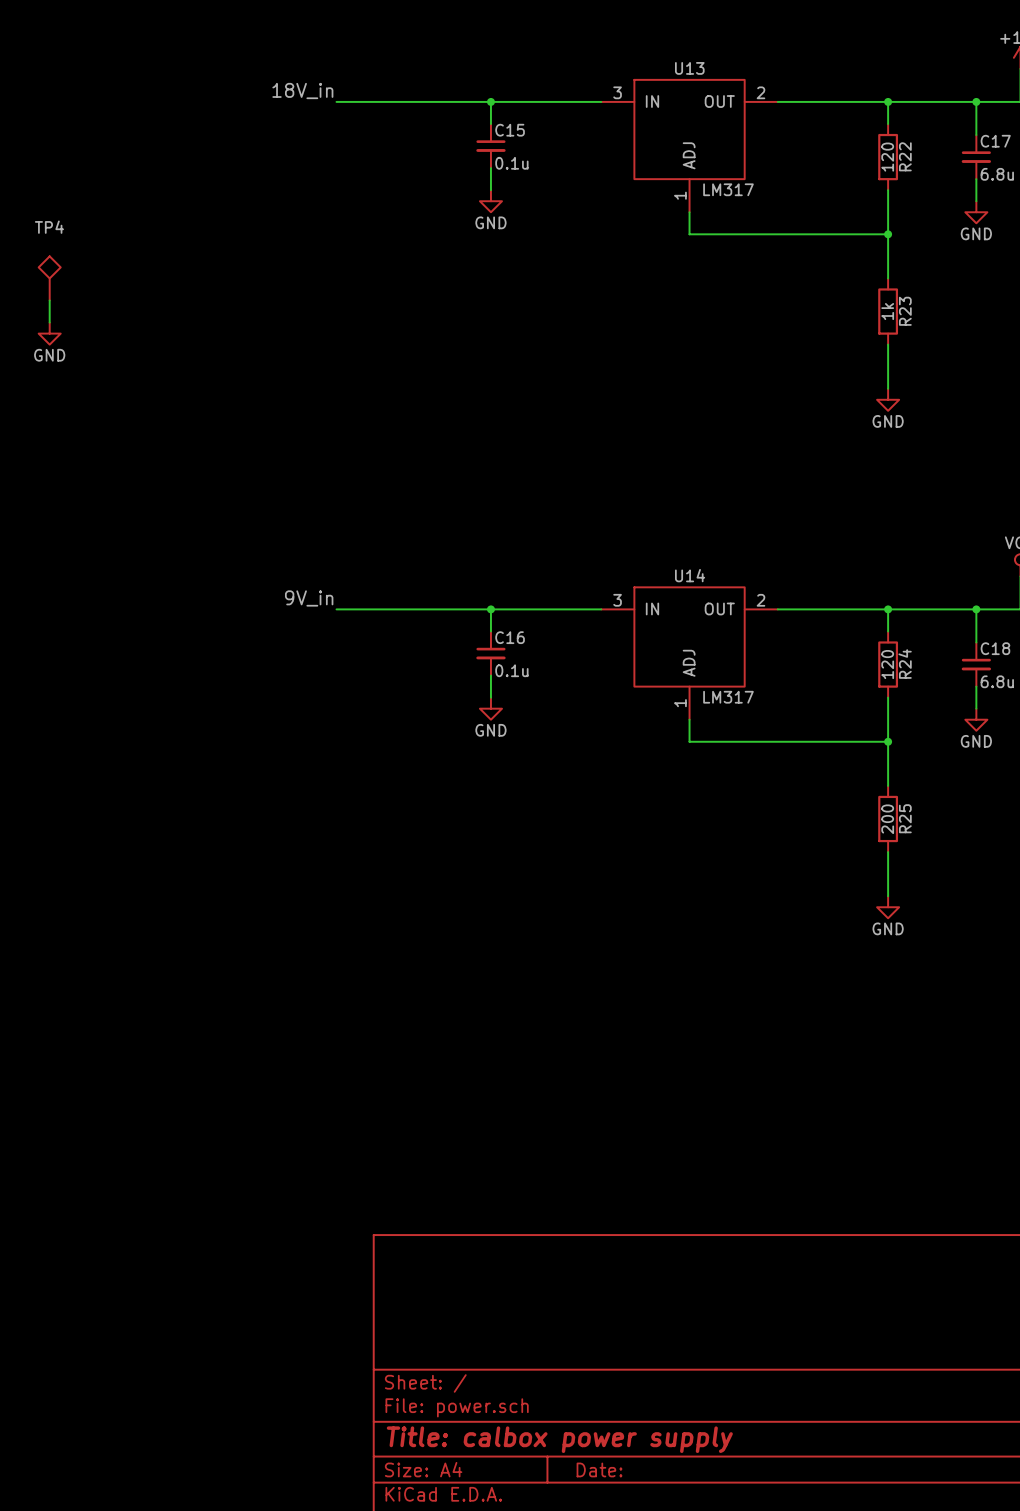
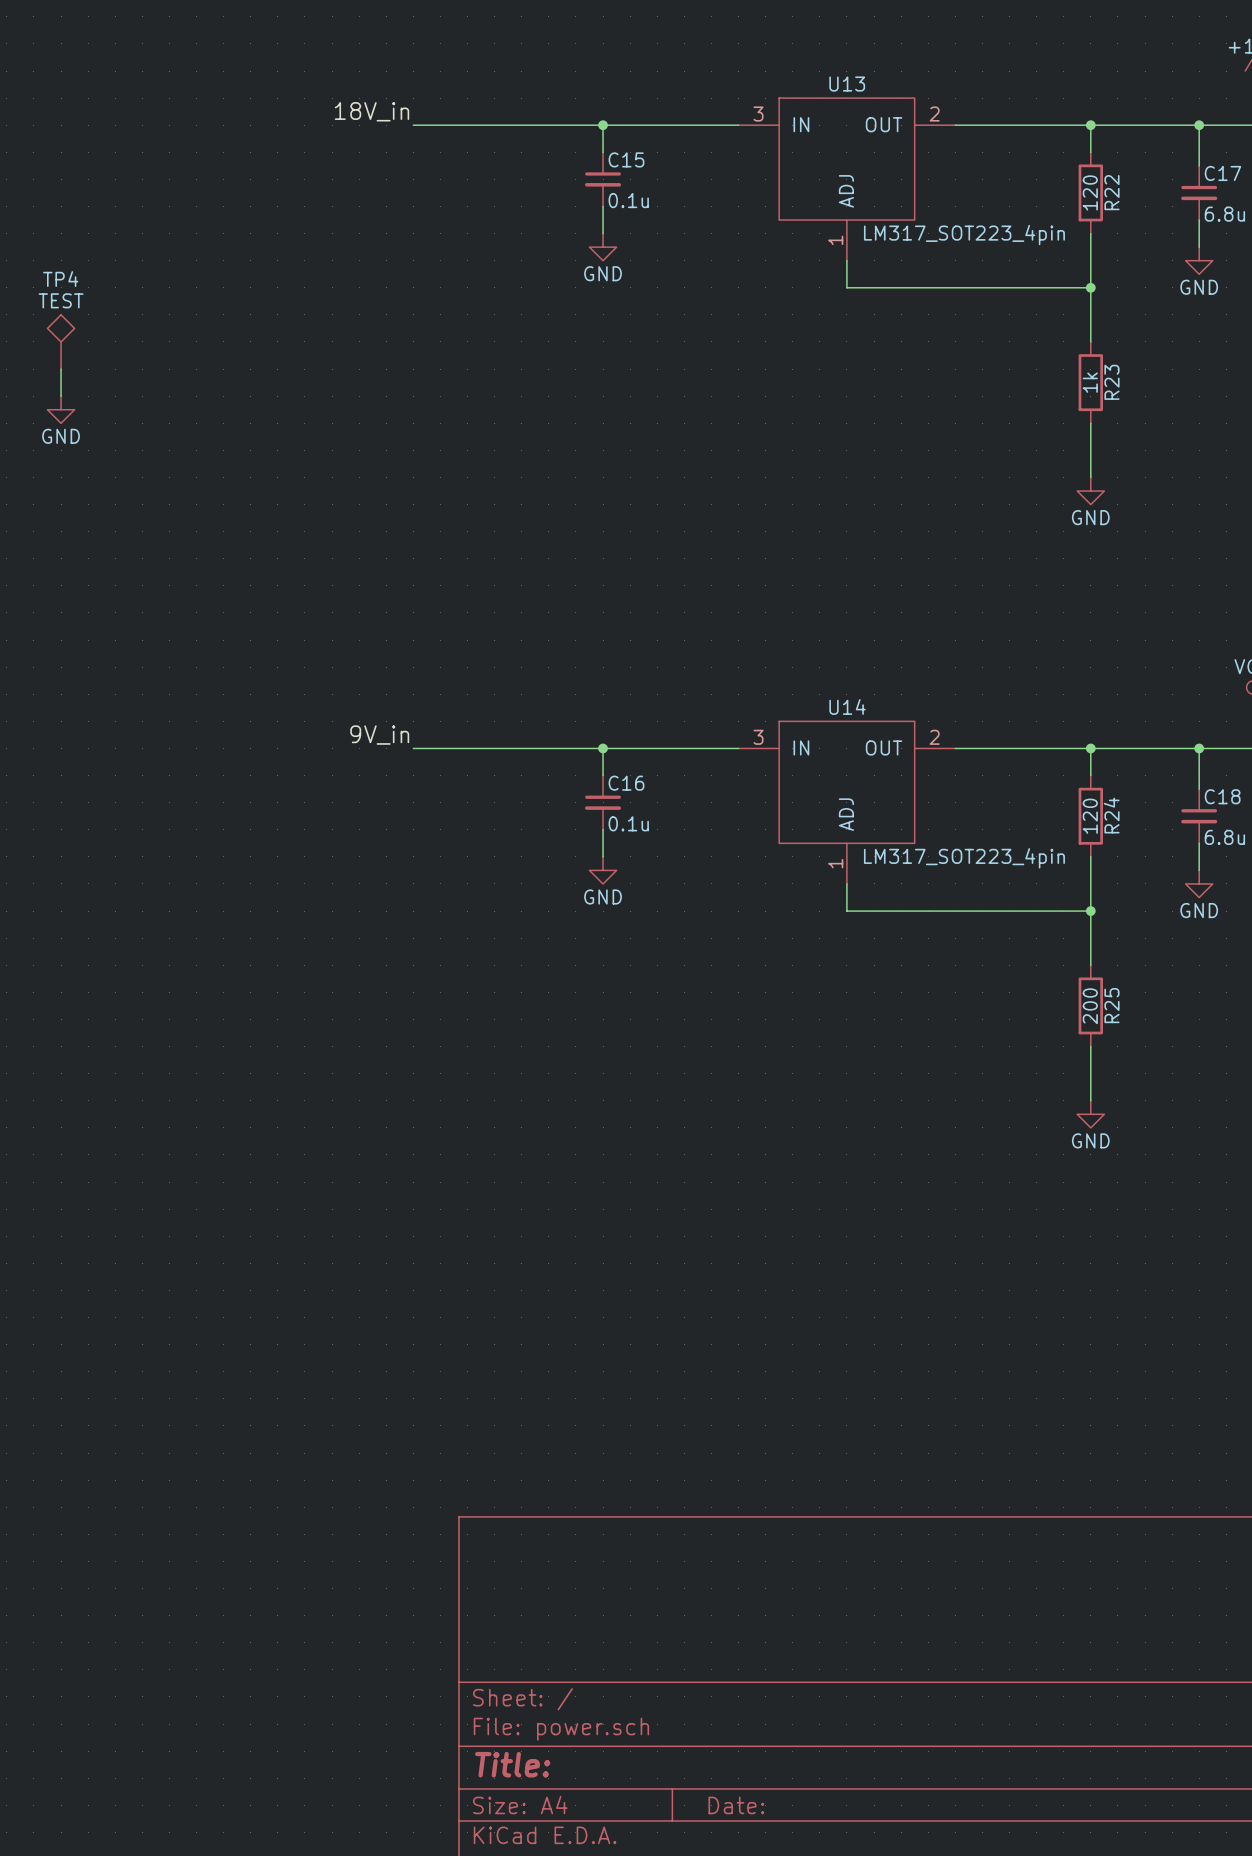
U13 value: LM317 (728, 189) -> LM317_SOT223_4pin (964, 235)
TP4 value: none -> TEST (61, 300)
U14 value: LM317 (728, 697) -> LM317_SOT223_4pin (964, 858)
title block: Title: calbox power supply (559, 1439) -> Title: (512, 1764)

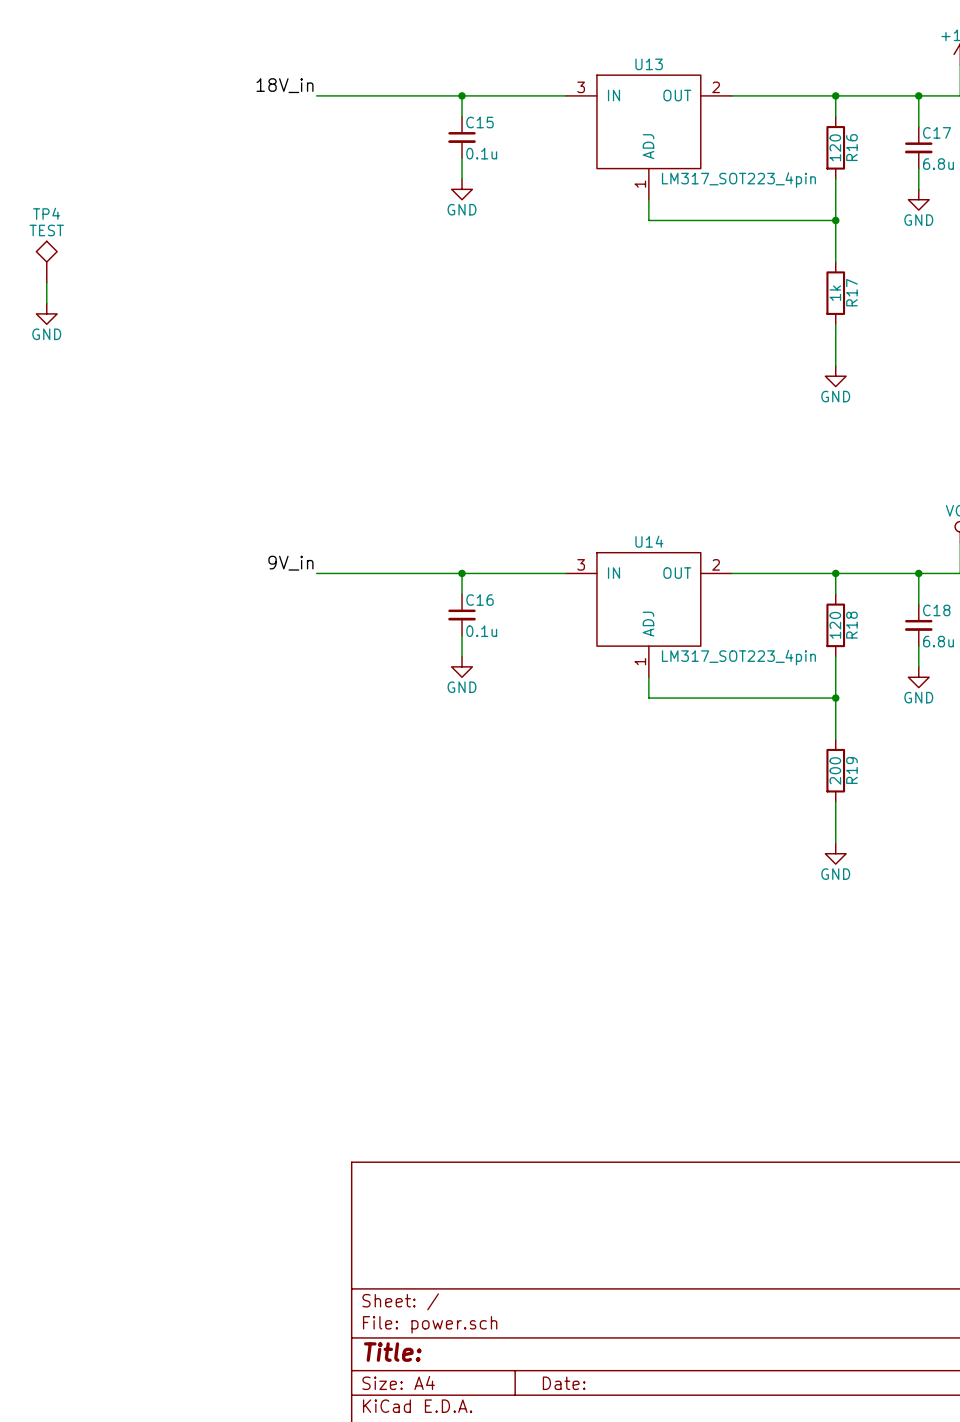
R22 name: R22 (1111, 192) -> R16 (851, 147)
R23 name: R23 (1111, 382) -> R17 (851, 292)
R24 name: R24 (1111, 815) -> R18 (851, 625)
R25 name: R25 (1111, 1005) -> R19 (851, 770)

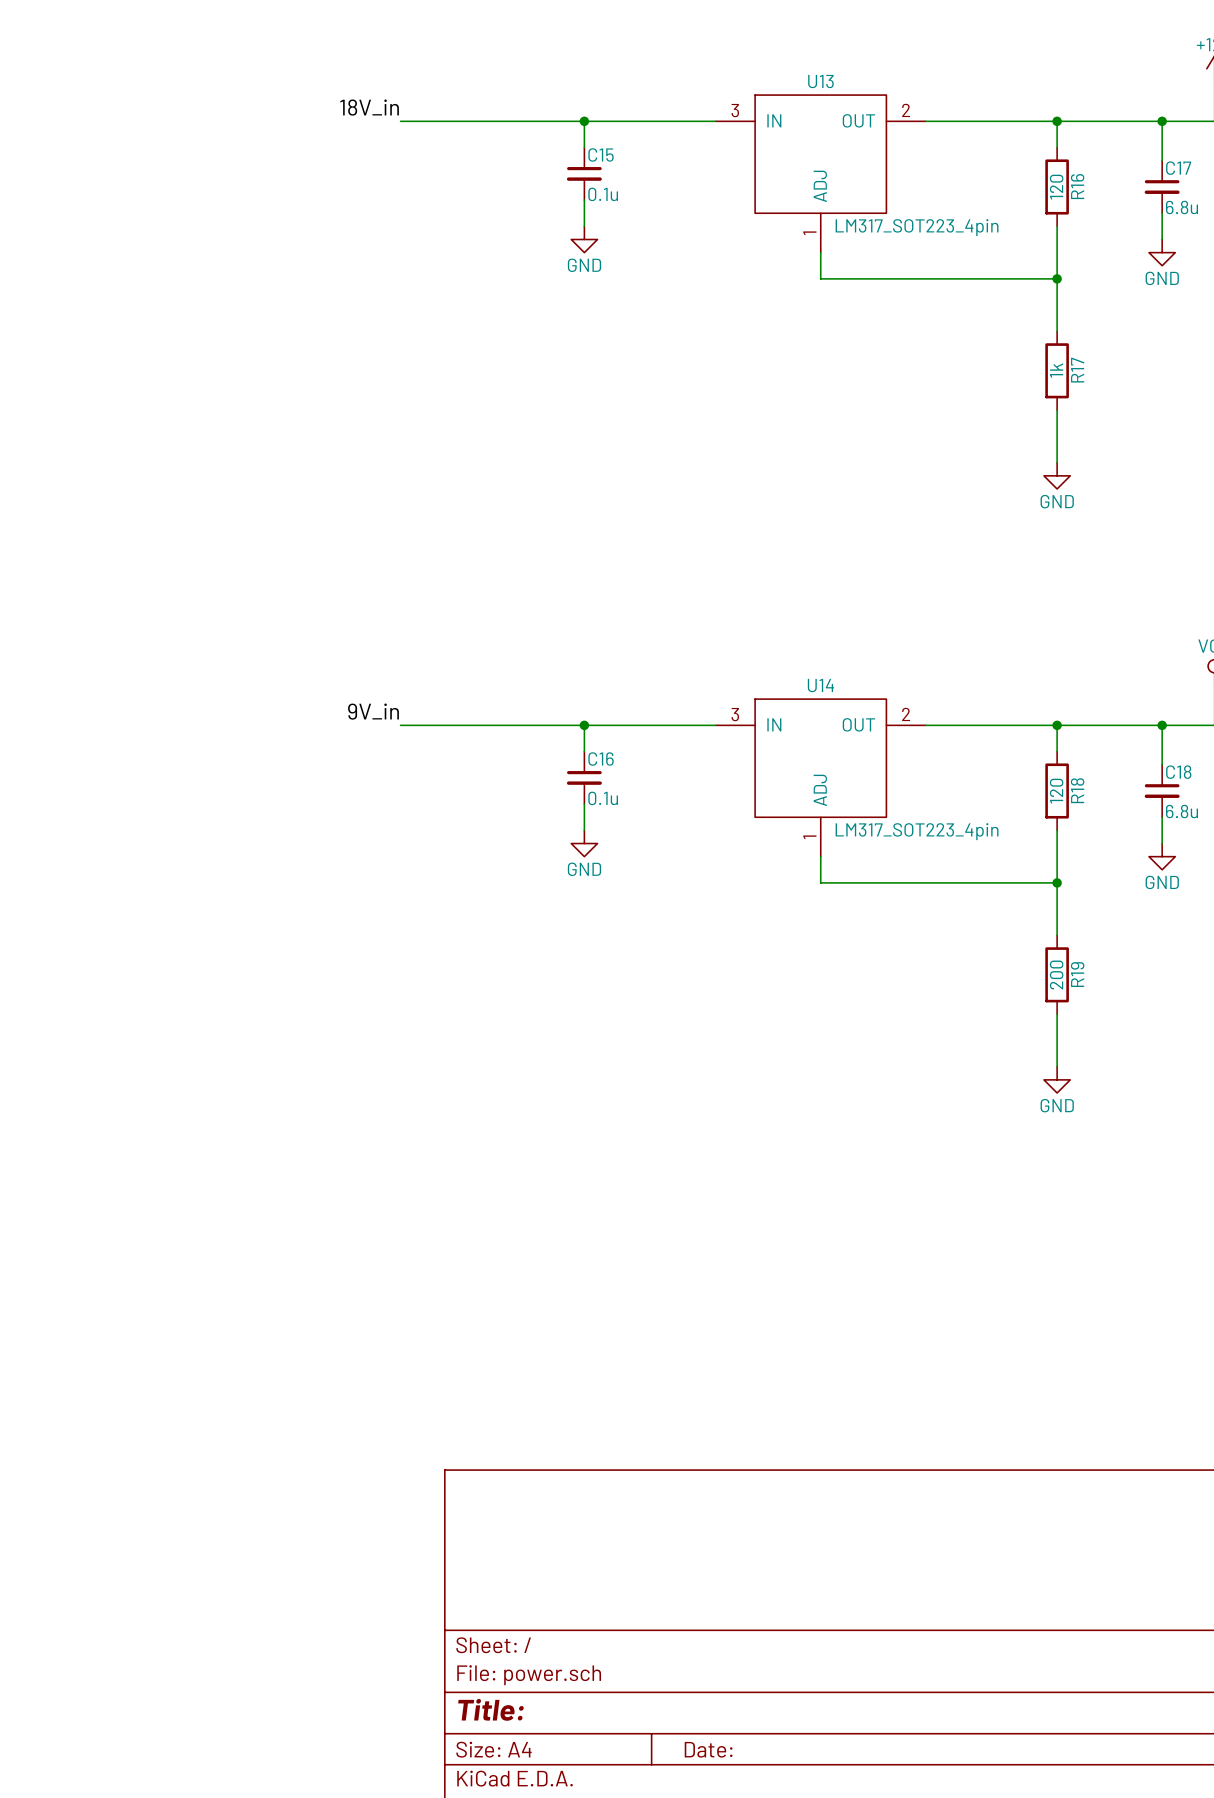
TP4: TEST (46, 262) -> none
wire: (46, 282) (46, 303) -> none
power symbol: GND (46, 313) -> none

